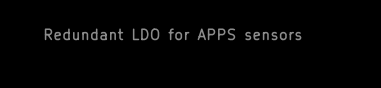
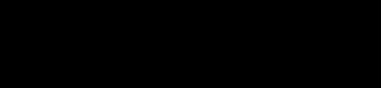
text: Redundant LDO for APPS sensors (173, 34) -> none

